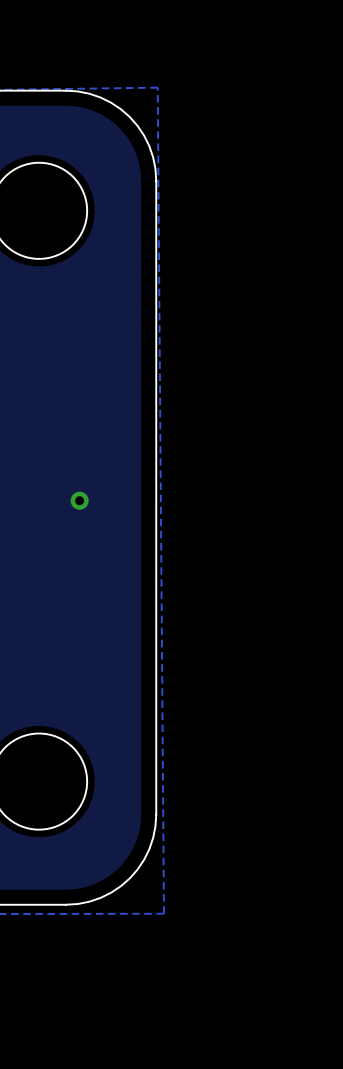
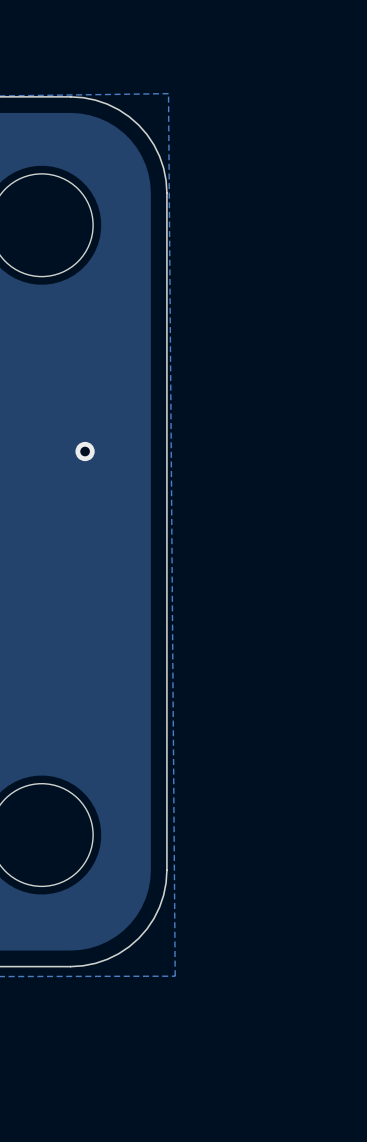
via position: (79, 500) -> (85, 451)

